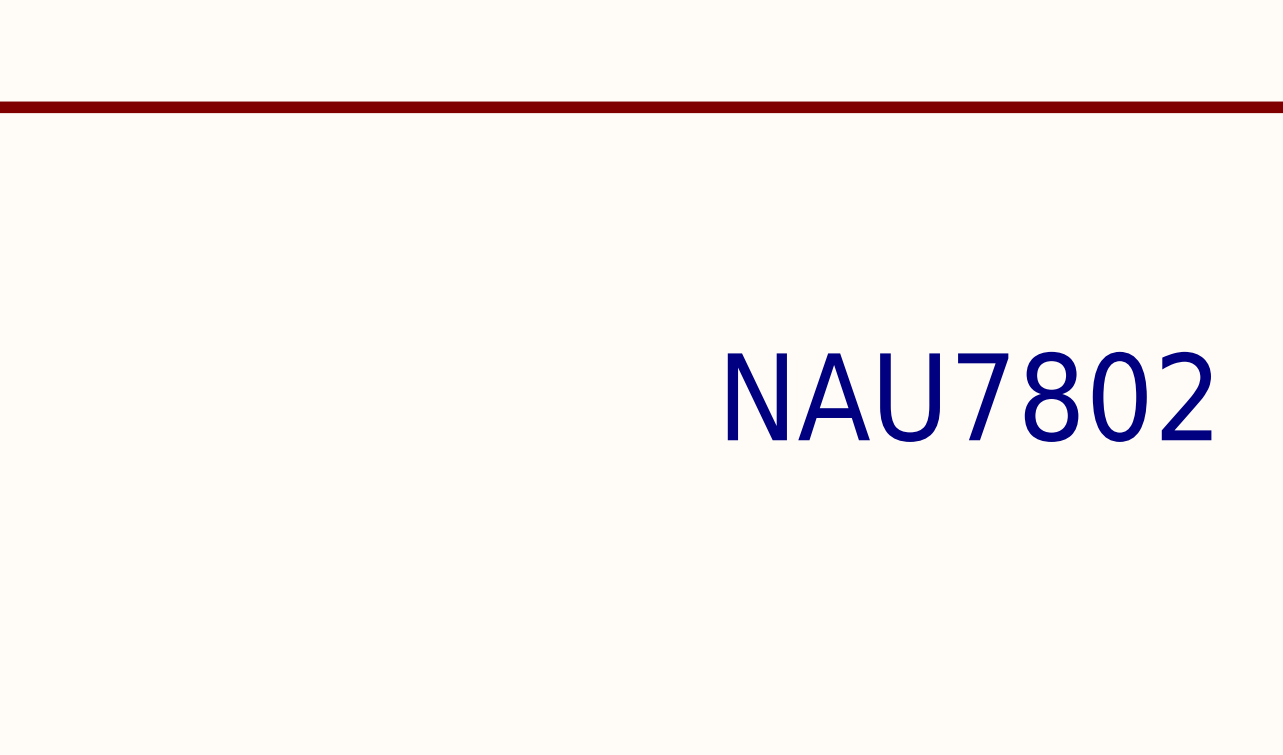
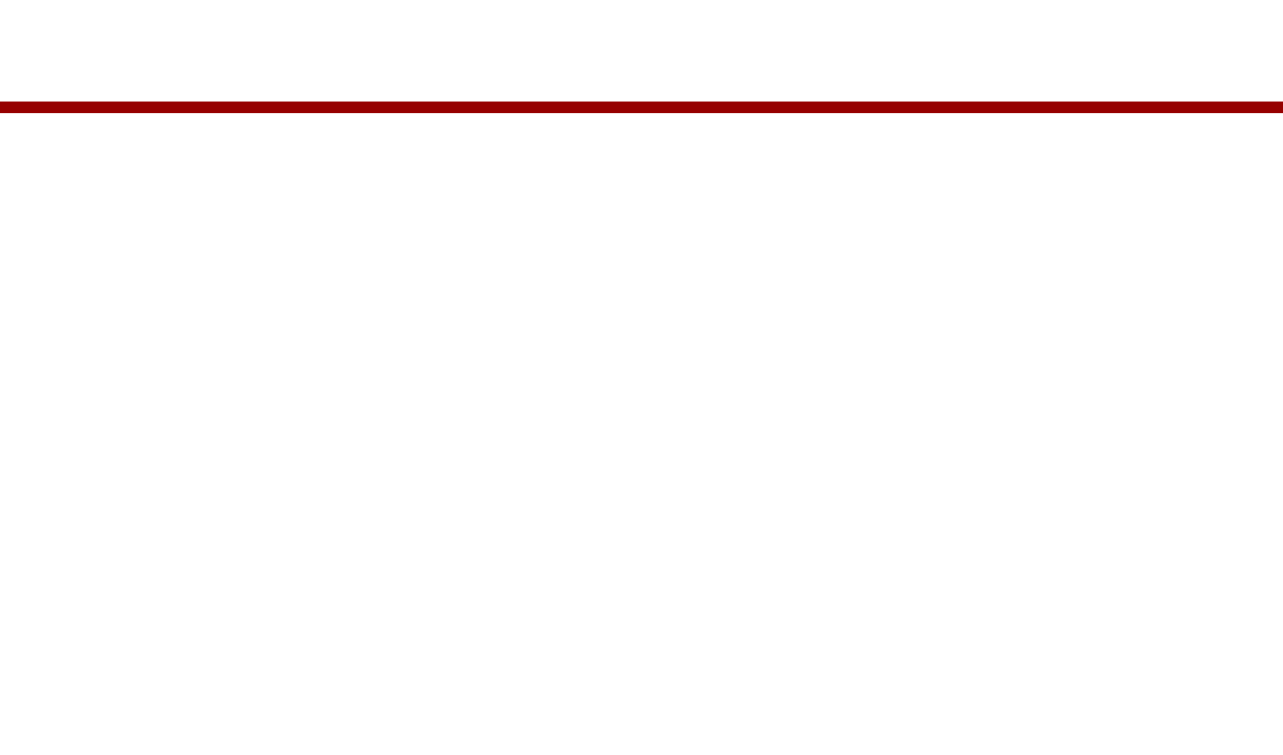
text: NAU7802 (969, 396) -> none

